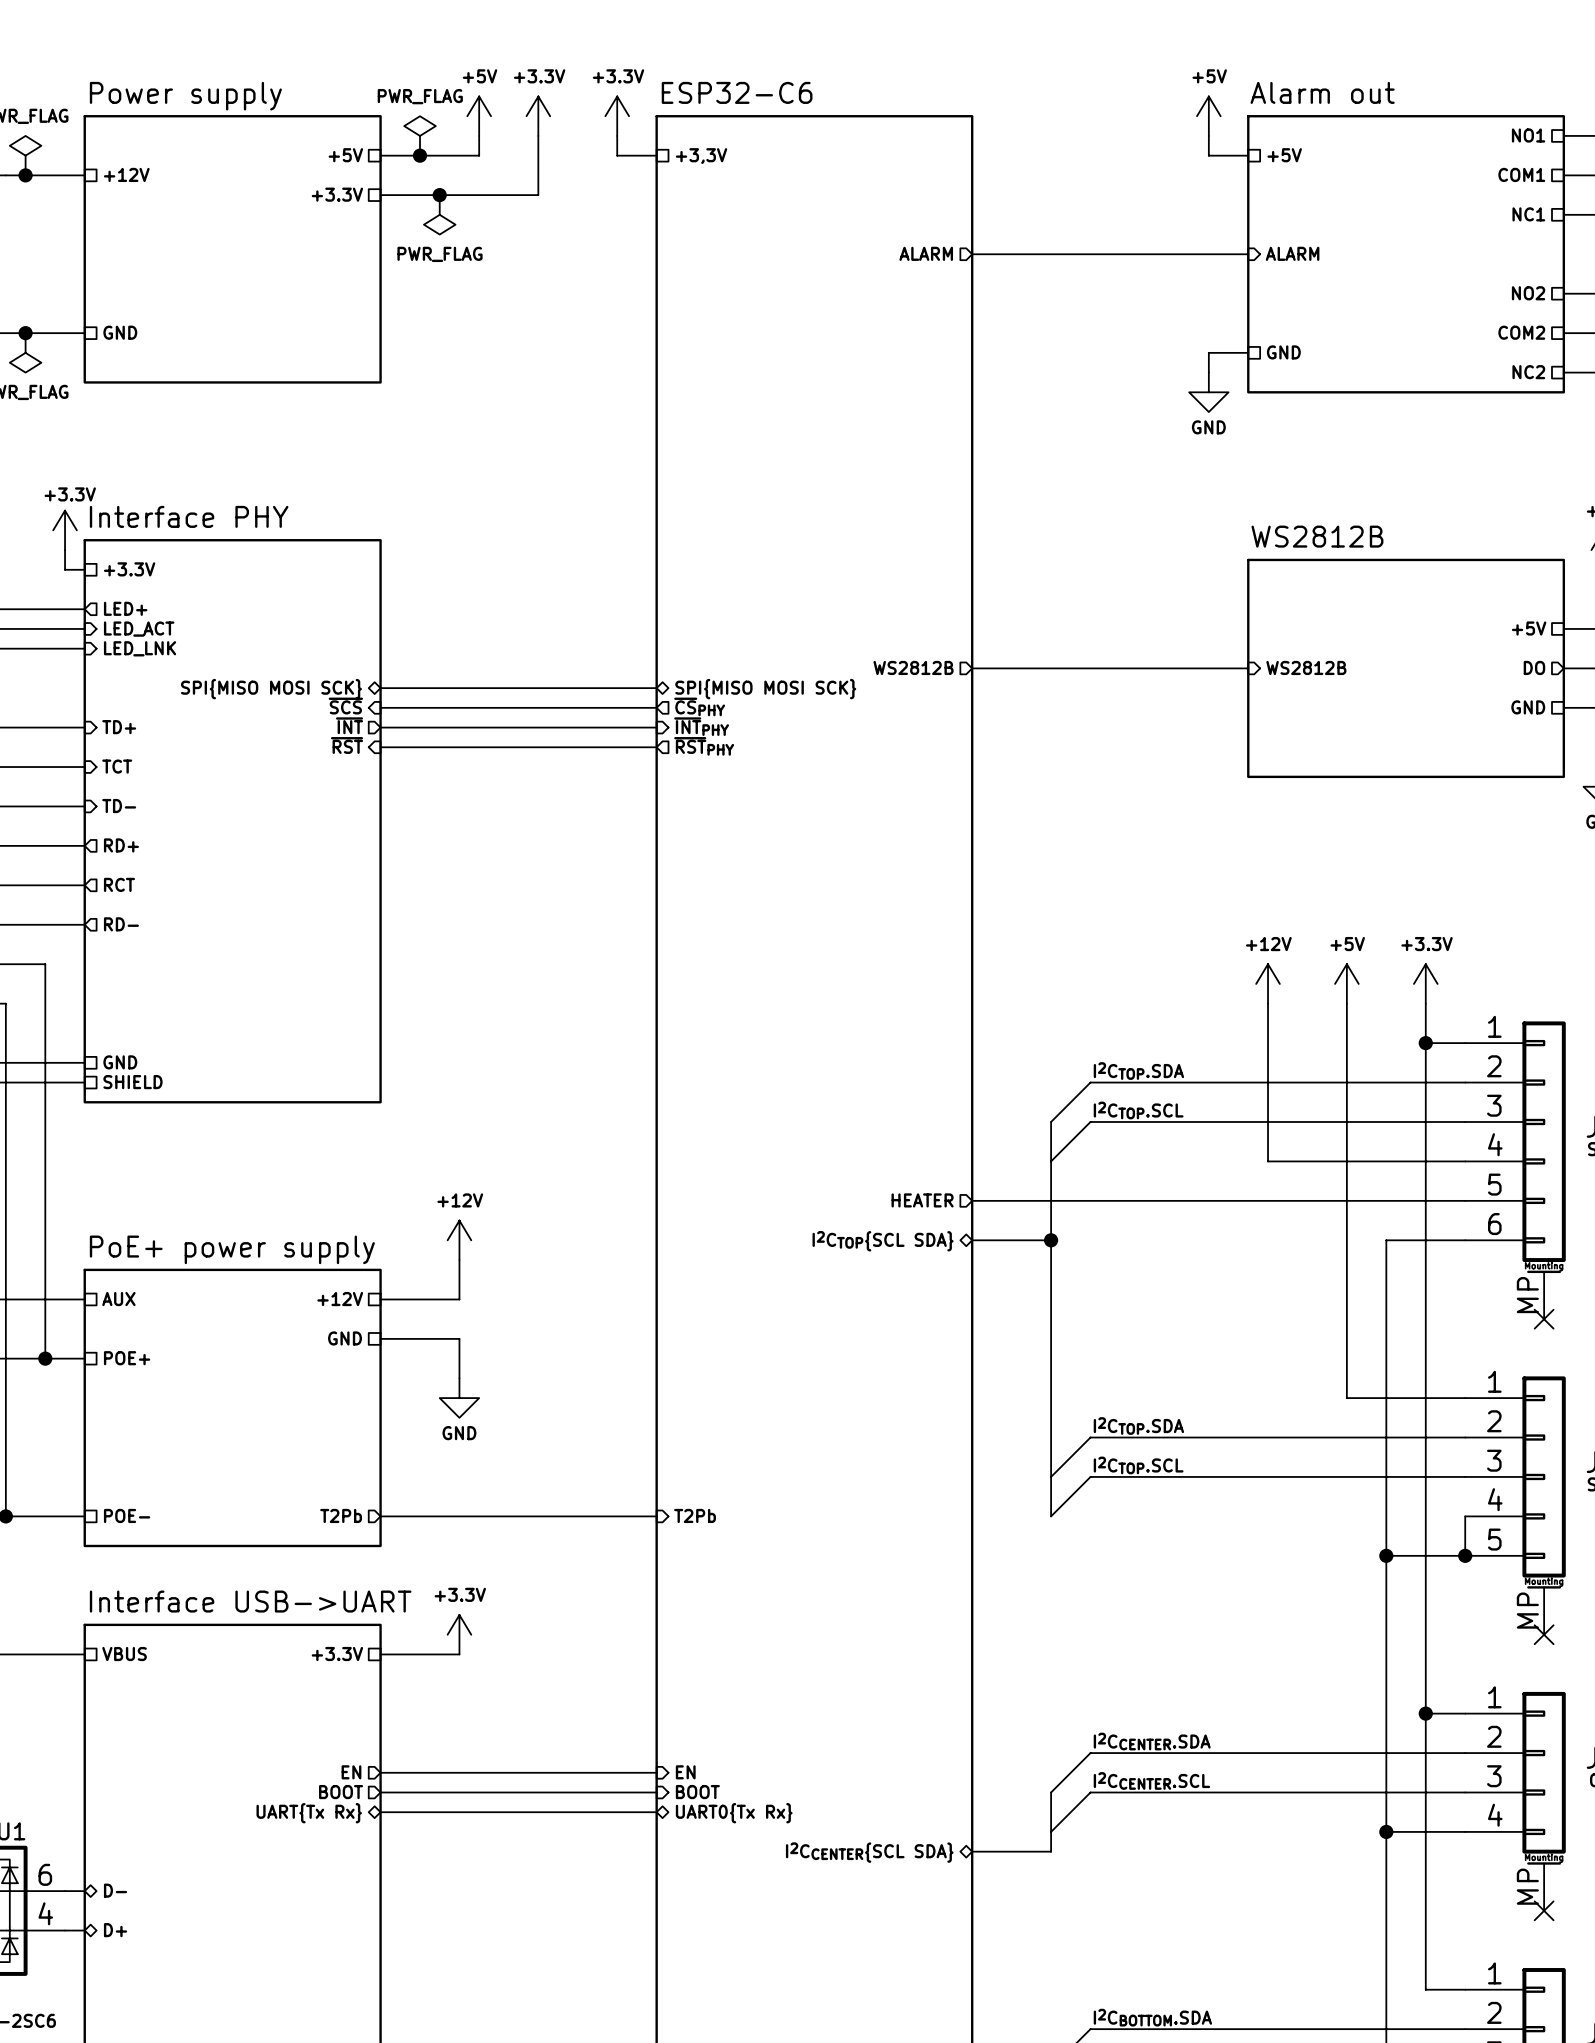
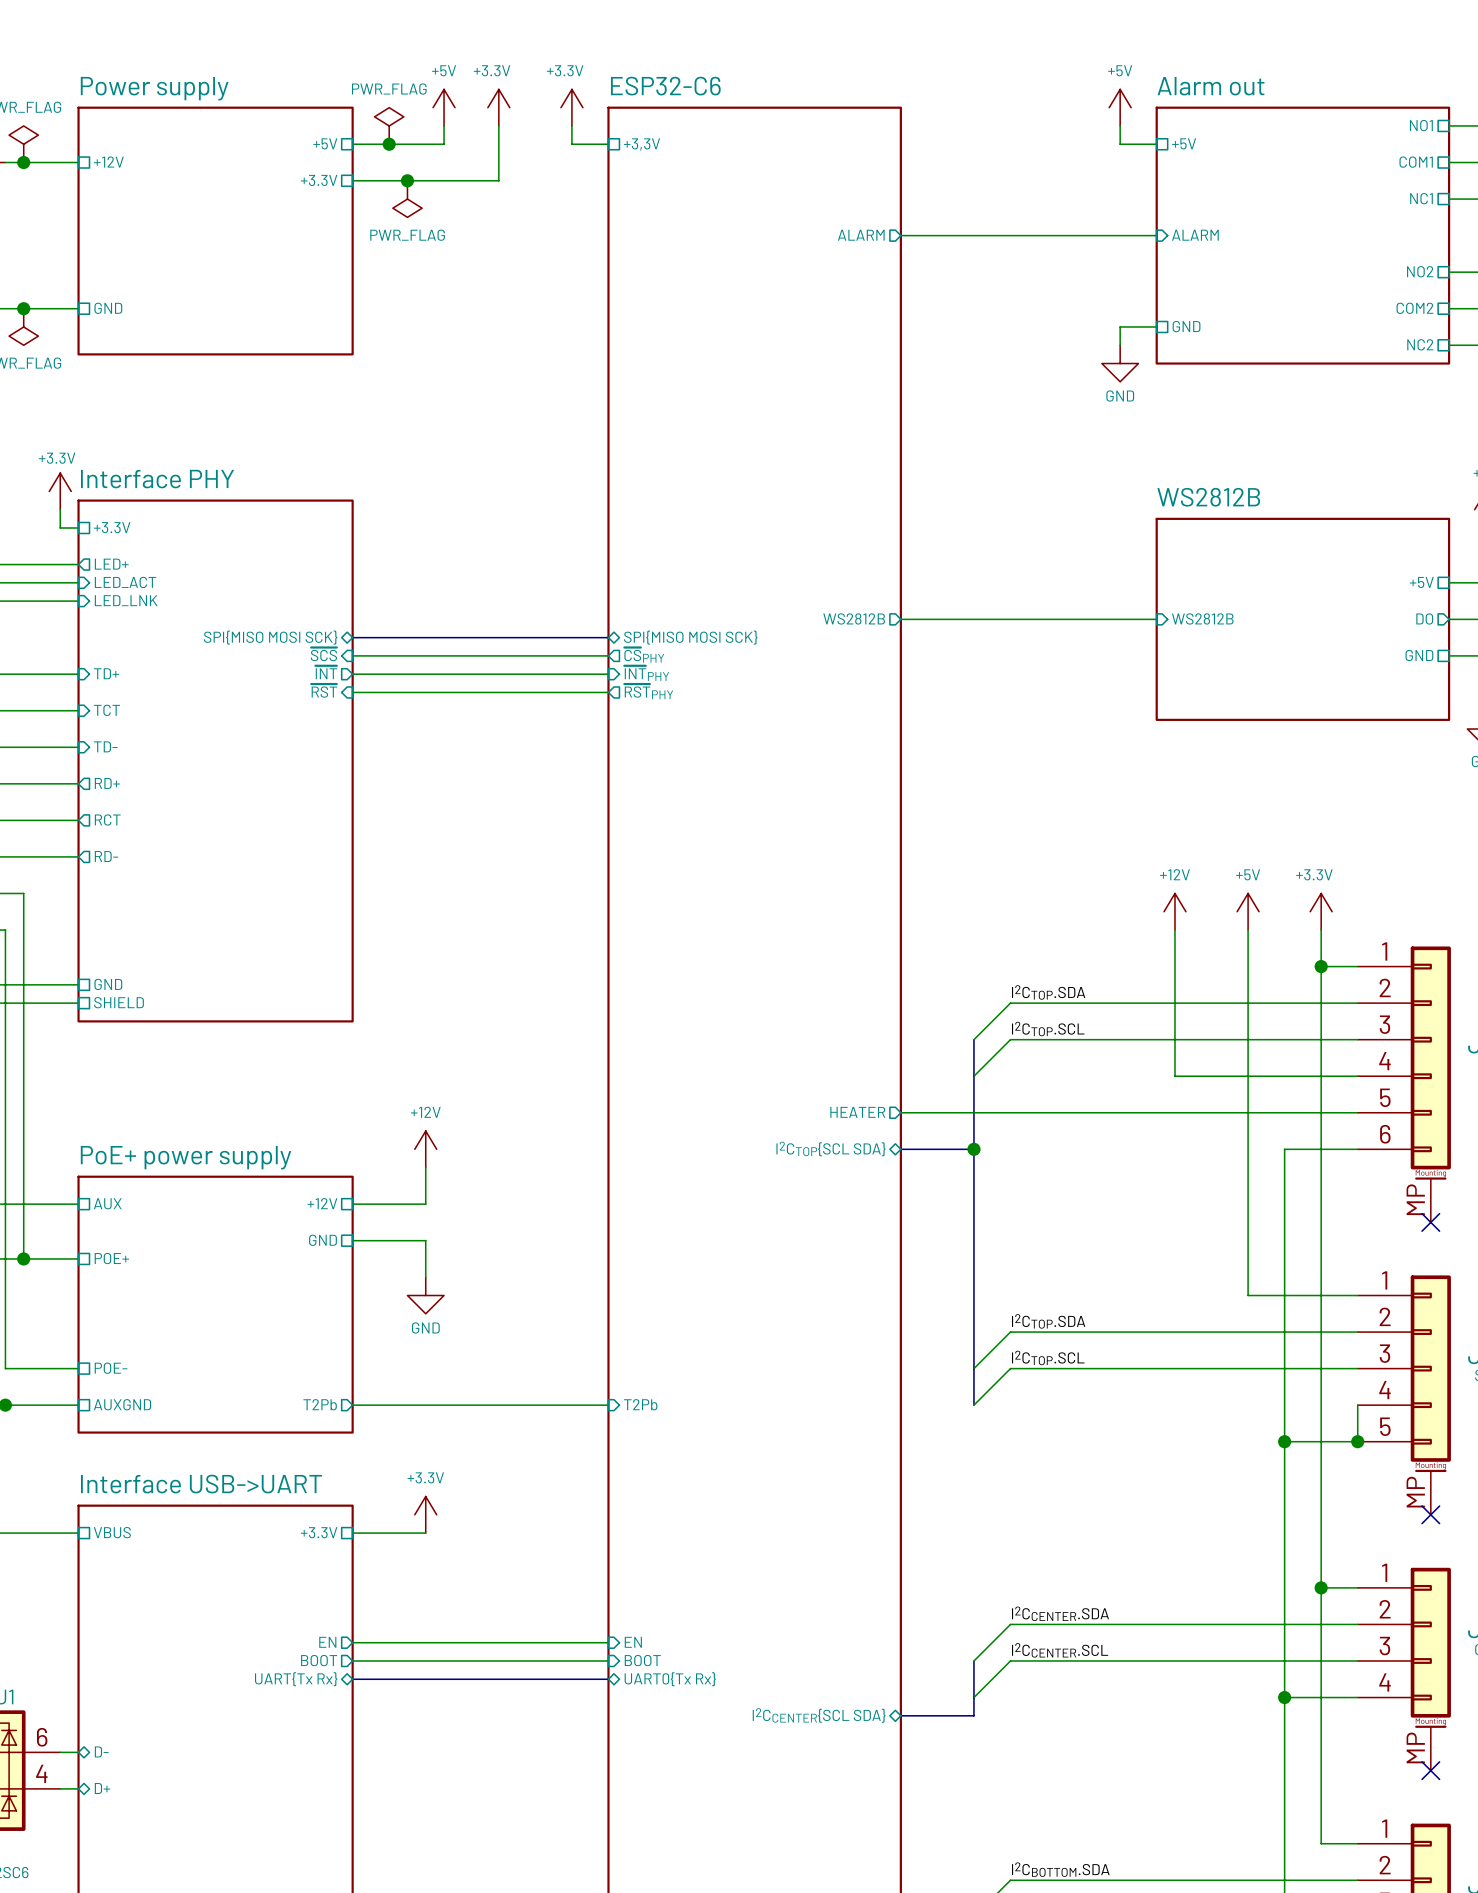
wire: (25, 964) (45, 964) (45, 1358) -> (23, 893) (23, 1258)
junction position: (45, 1358) -> (23, 1258)
wire: (5, 1476) (5, 1516) -> (5, 1368) (78, 1368)
sheet pin: none -> POE- (111, 1368)
sheet pin: POE- (127, 1515) -> AUXGND (122, 1404)

